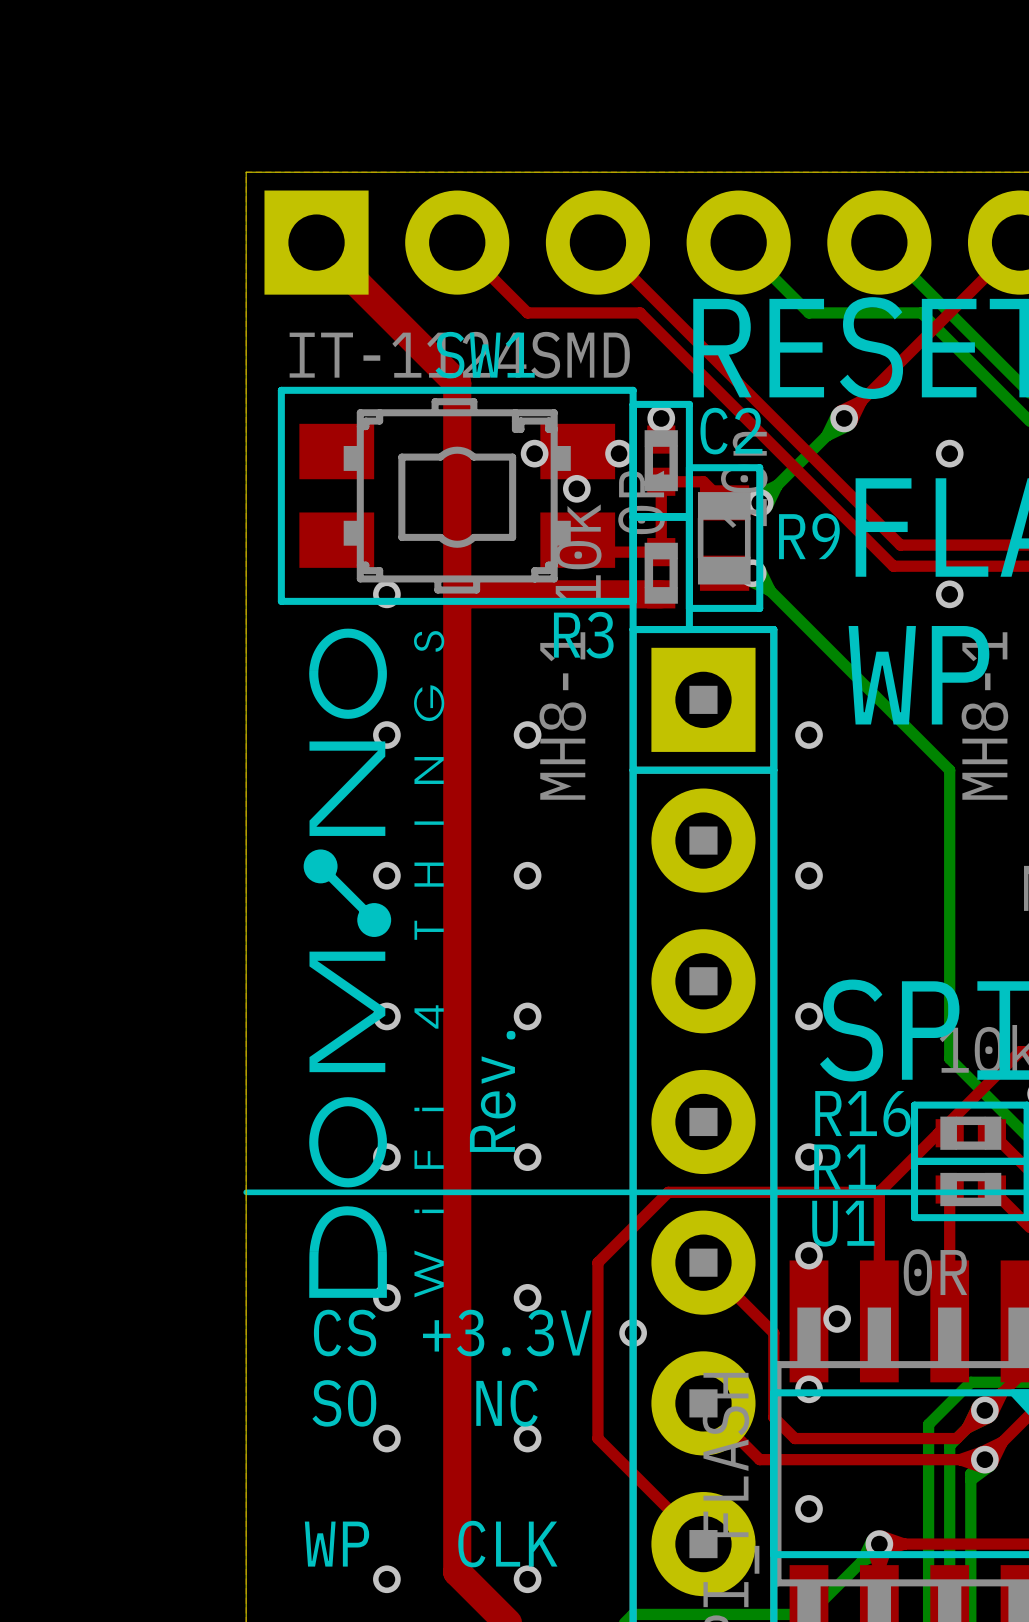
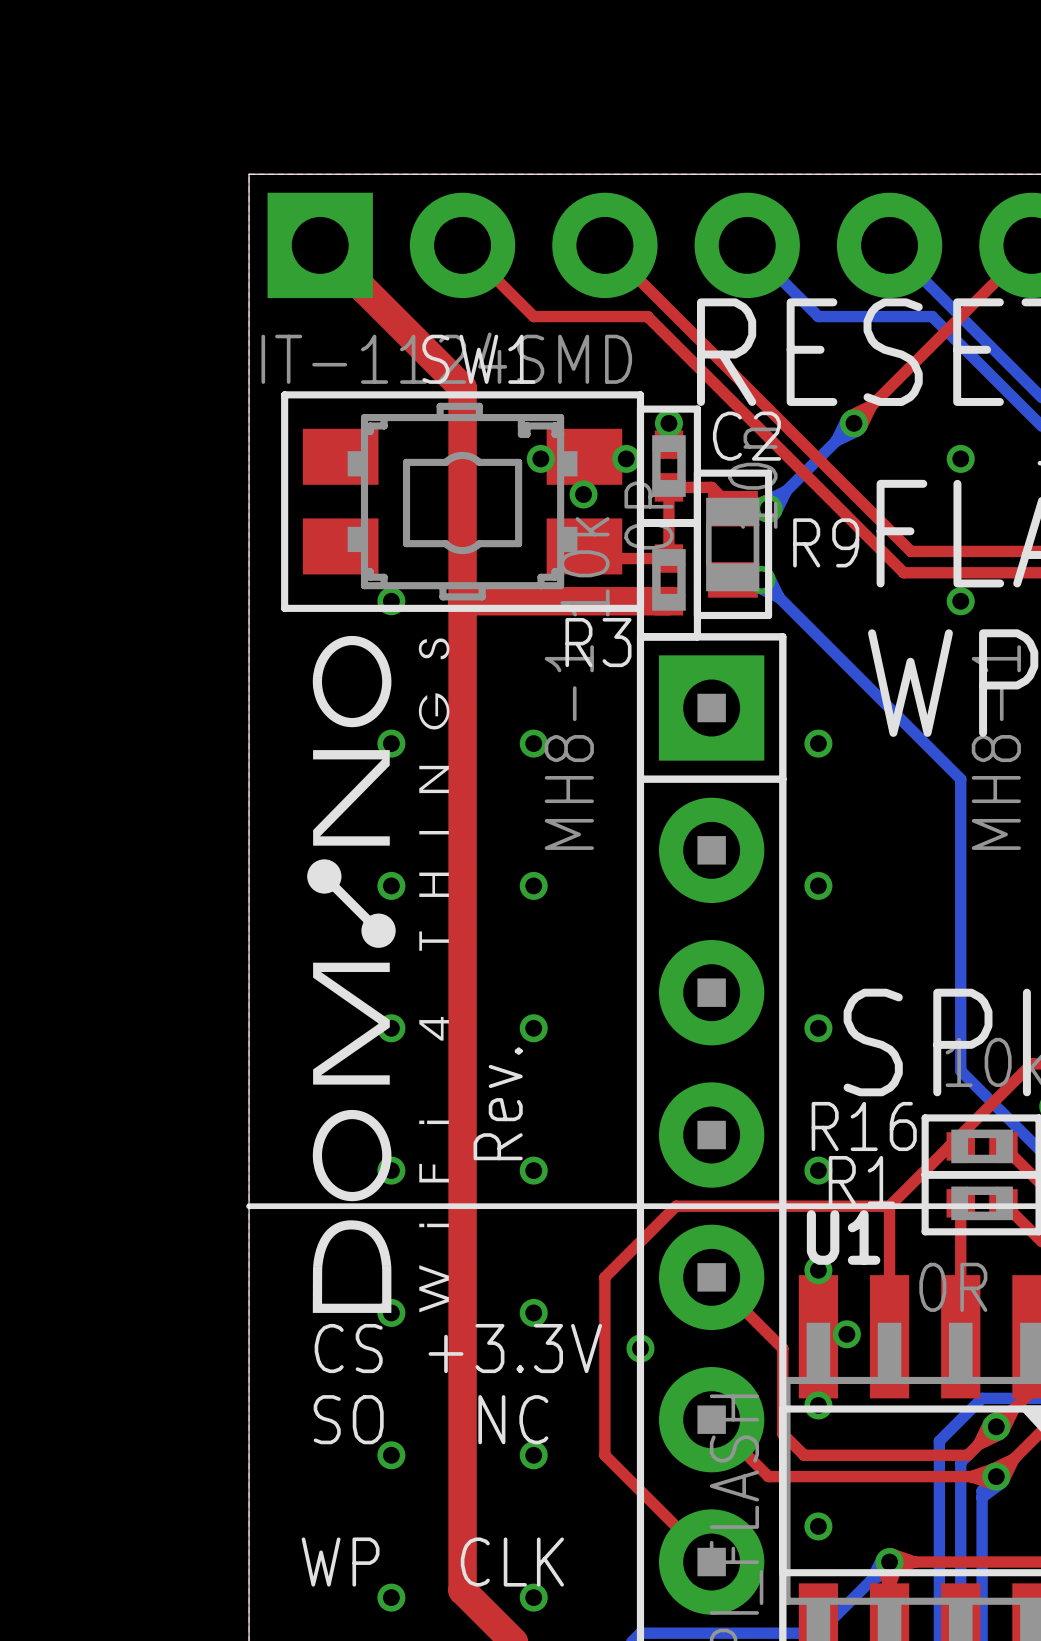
U1 name position: U1 (843, 1223) -> U1 (843, 1237)

